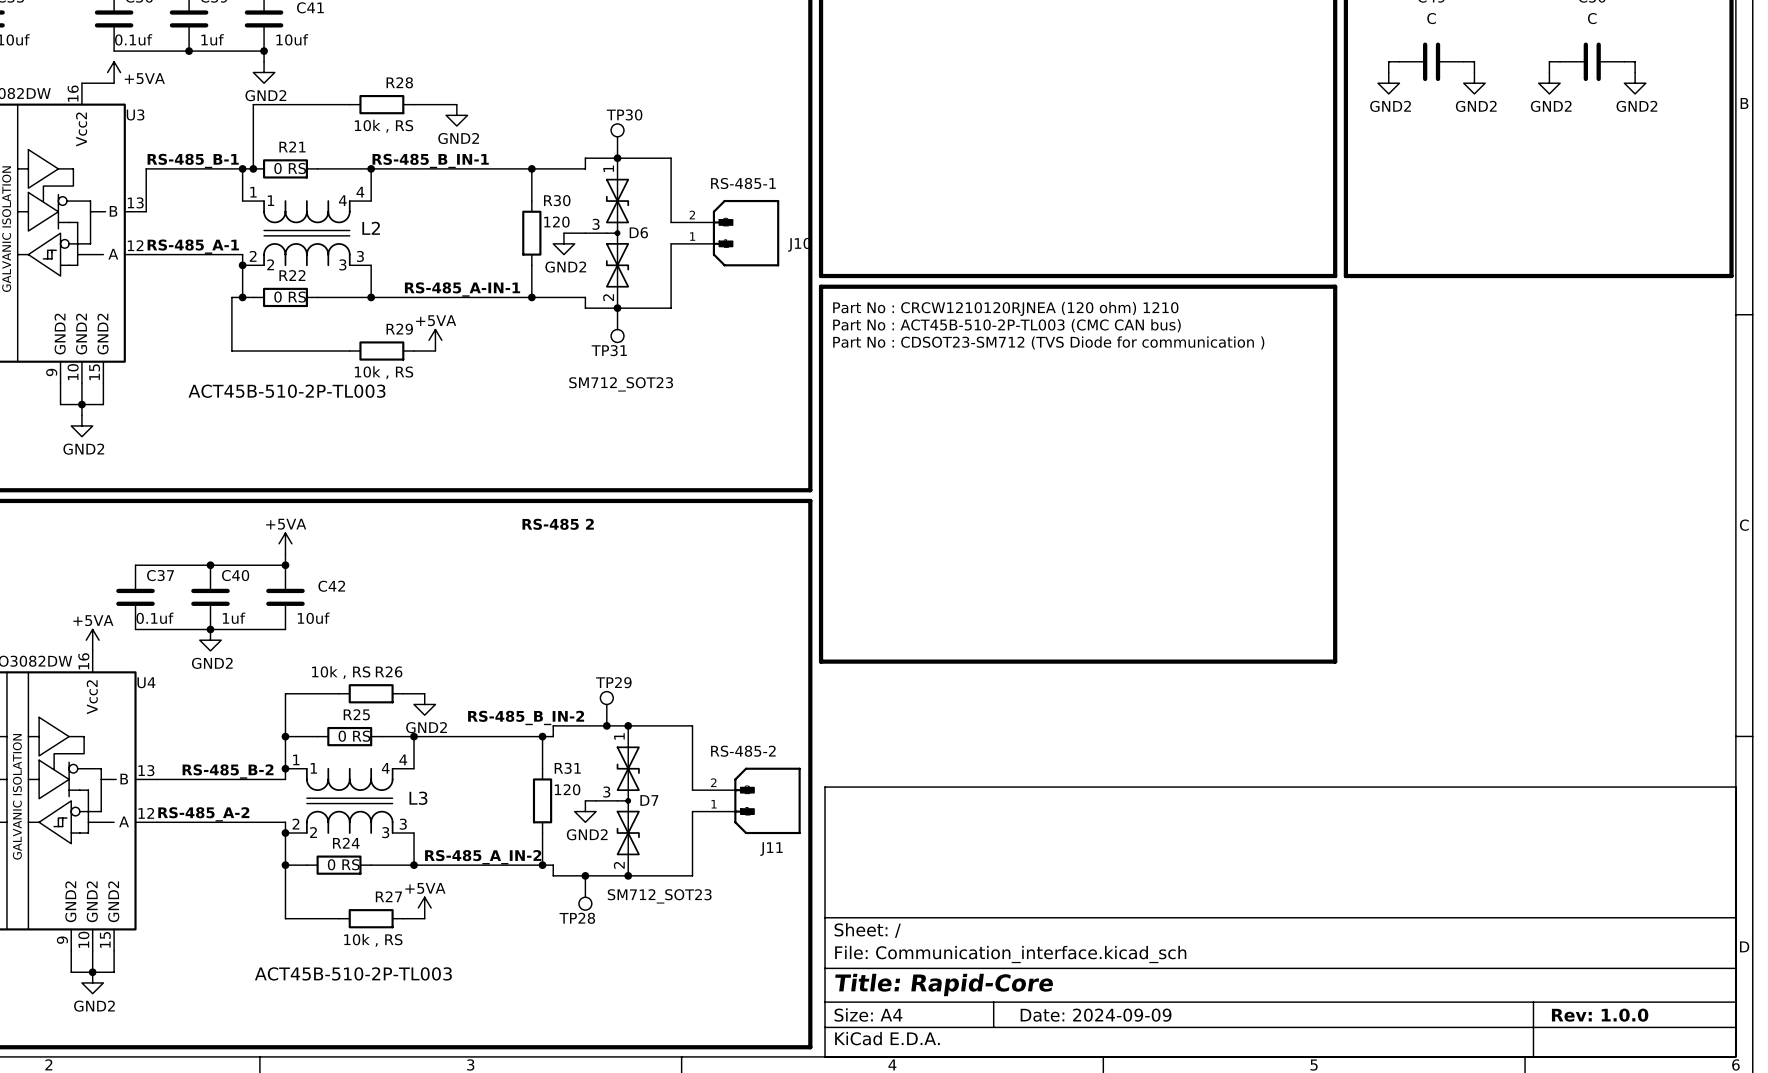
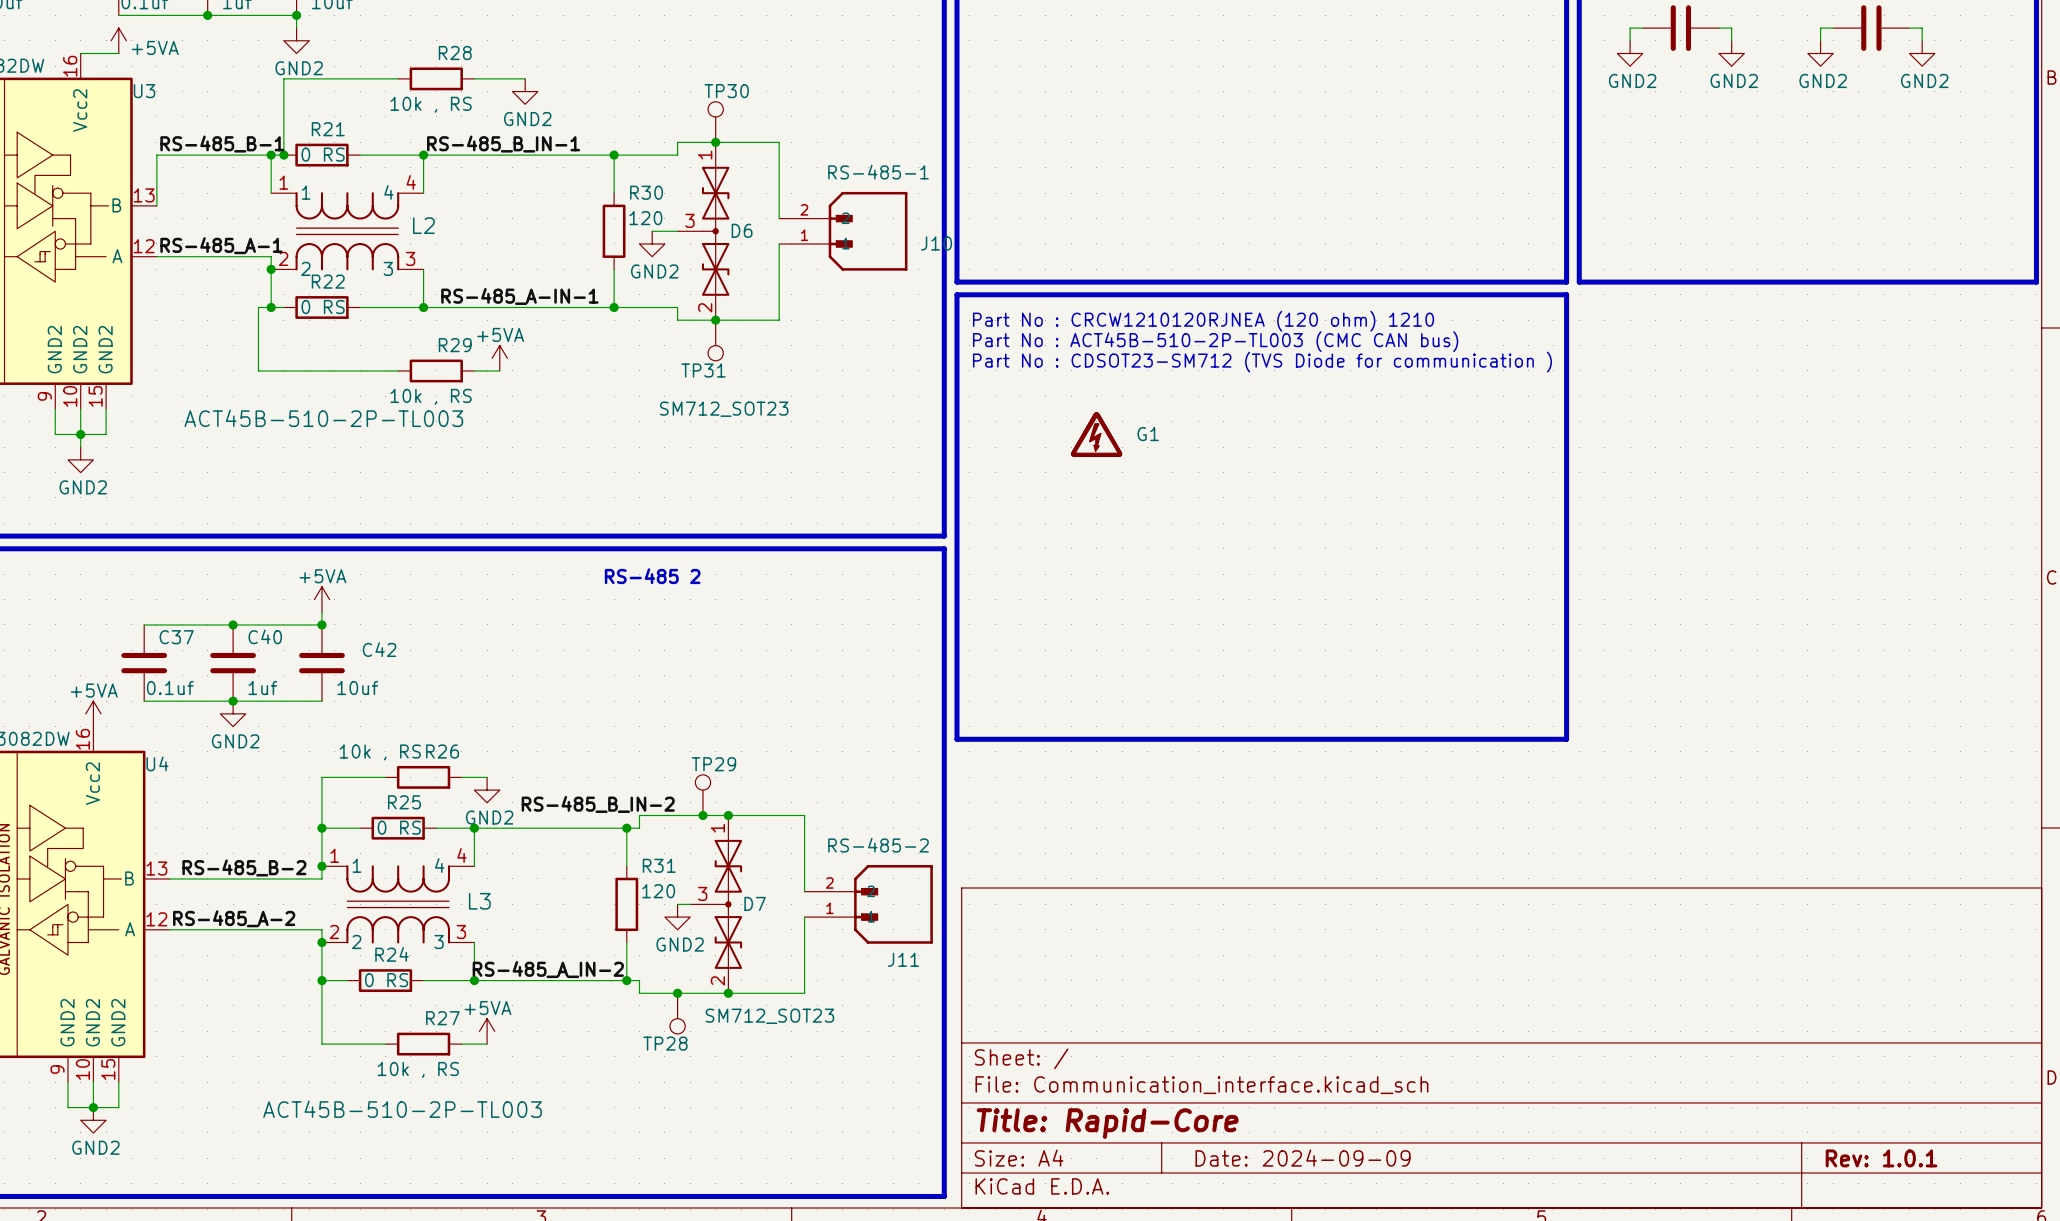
G1: none -> (1096, 434)
title block: Rev: 1.0.0 (1600, 1015) -> Rev: 1.0.1 (1881, 1158)

